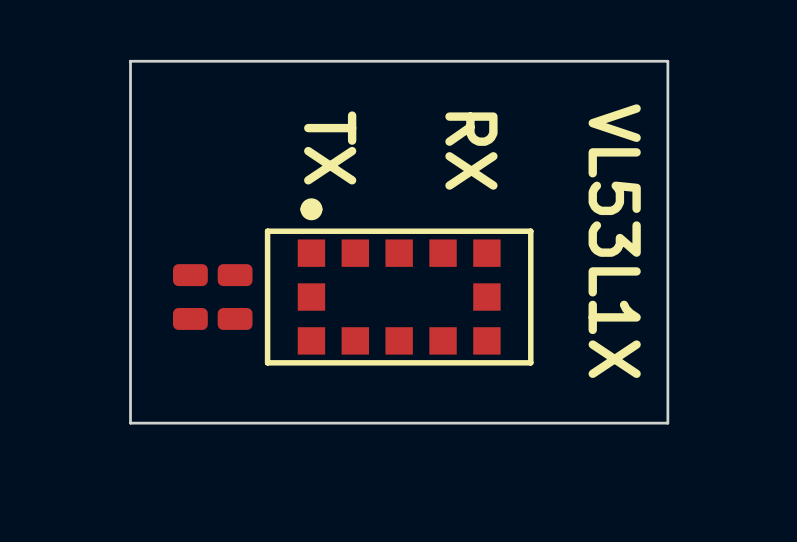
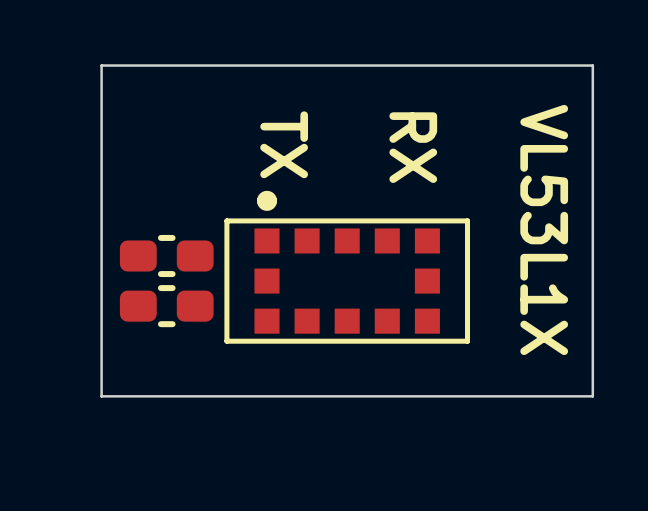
part footprint: [173, 264, 253, 287] -> [119, 234, 214, 278]
part footprint: [173, 308, 253, 330] -> [119, 285, 214, 328]

